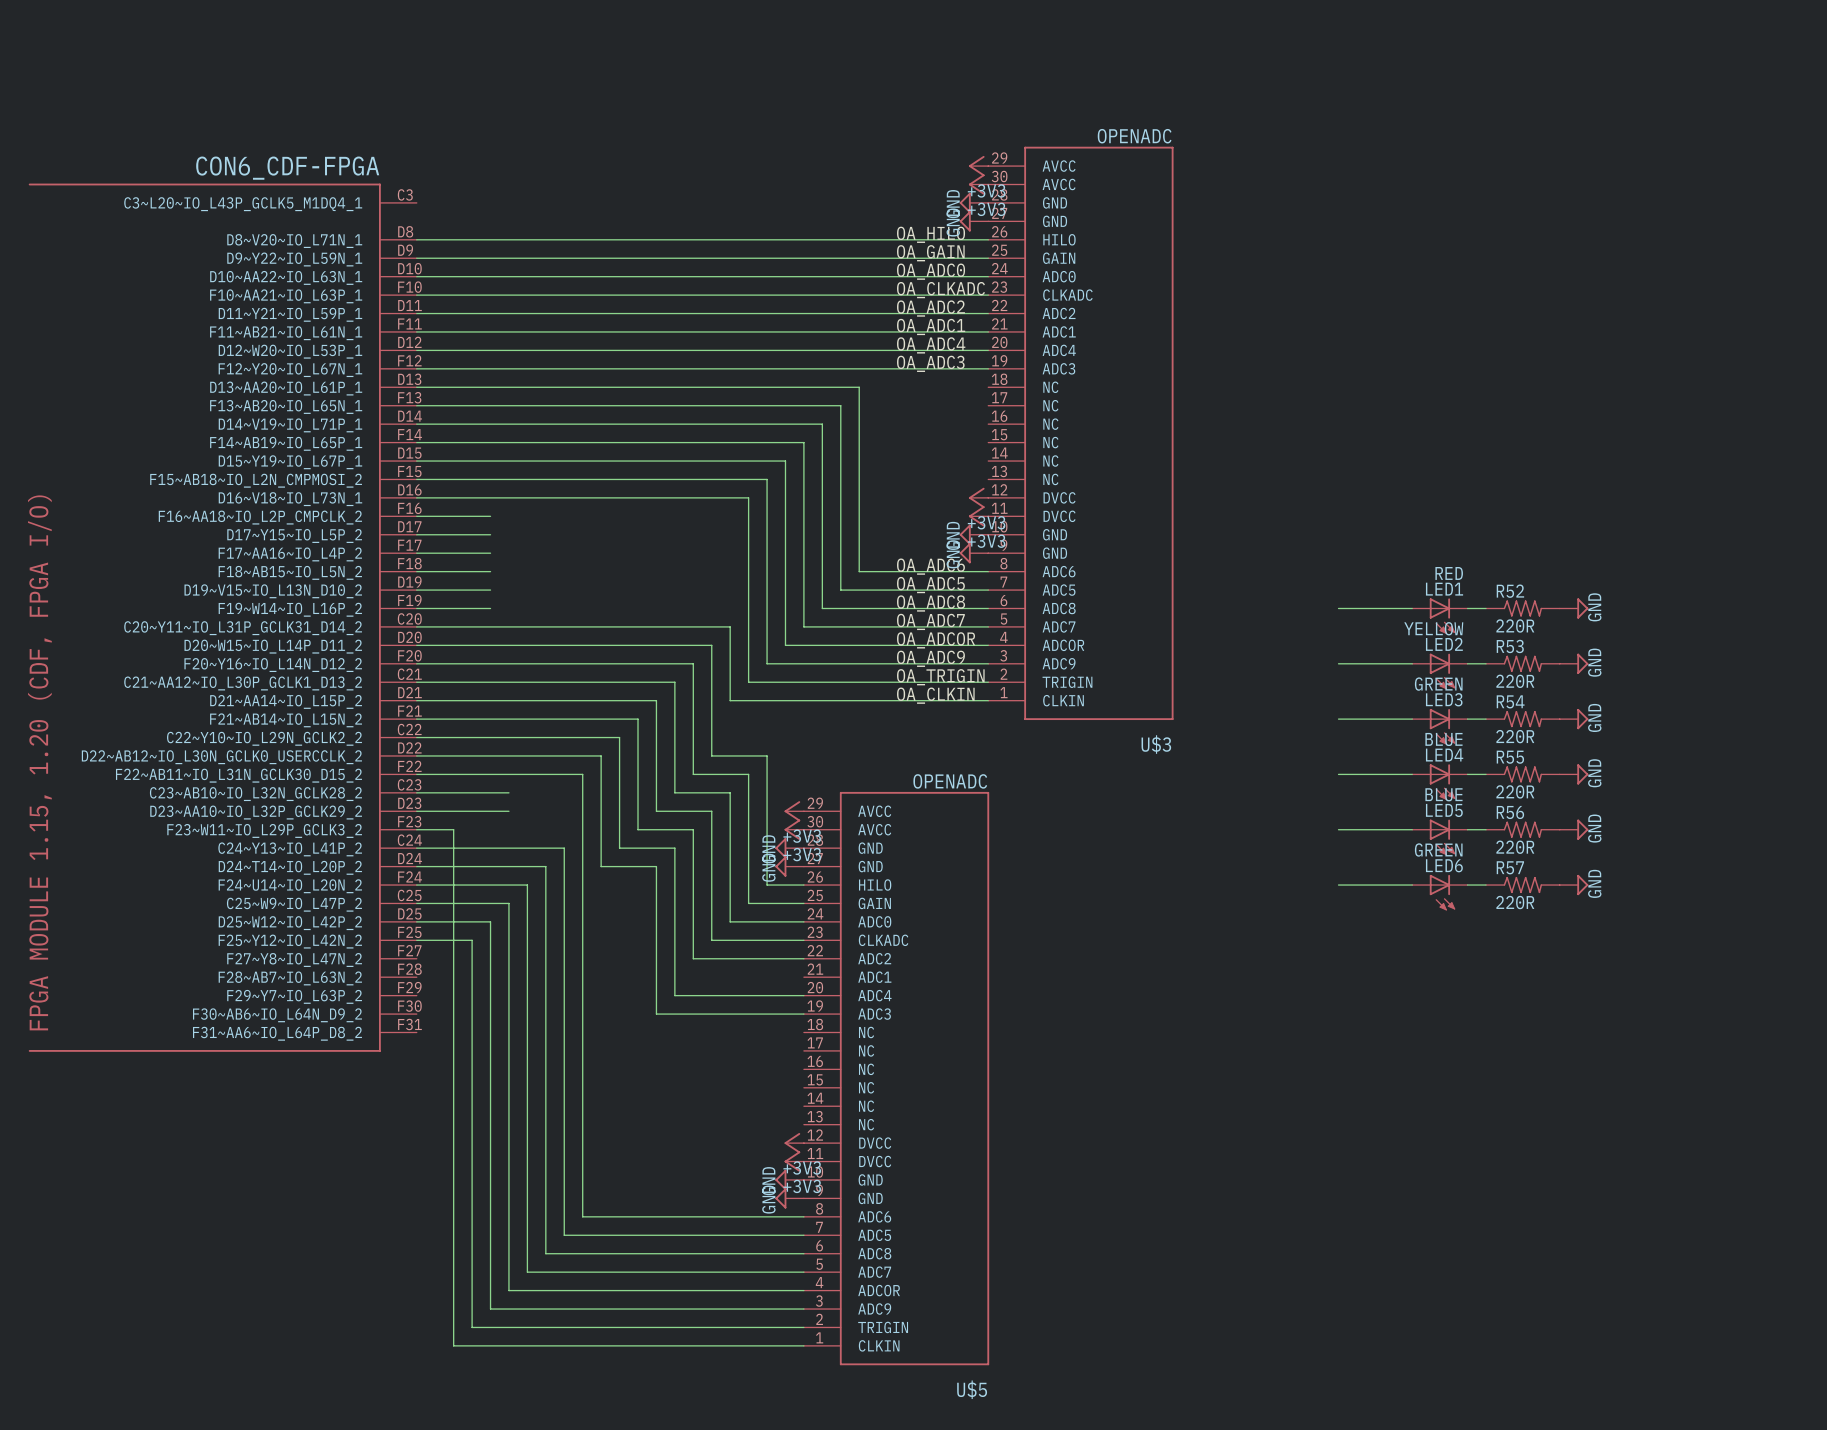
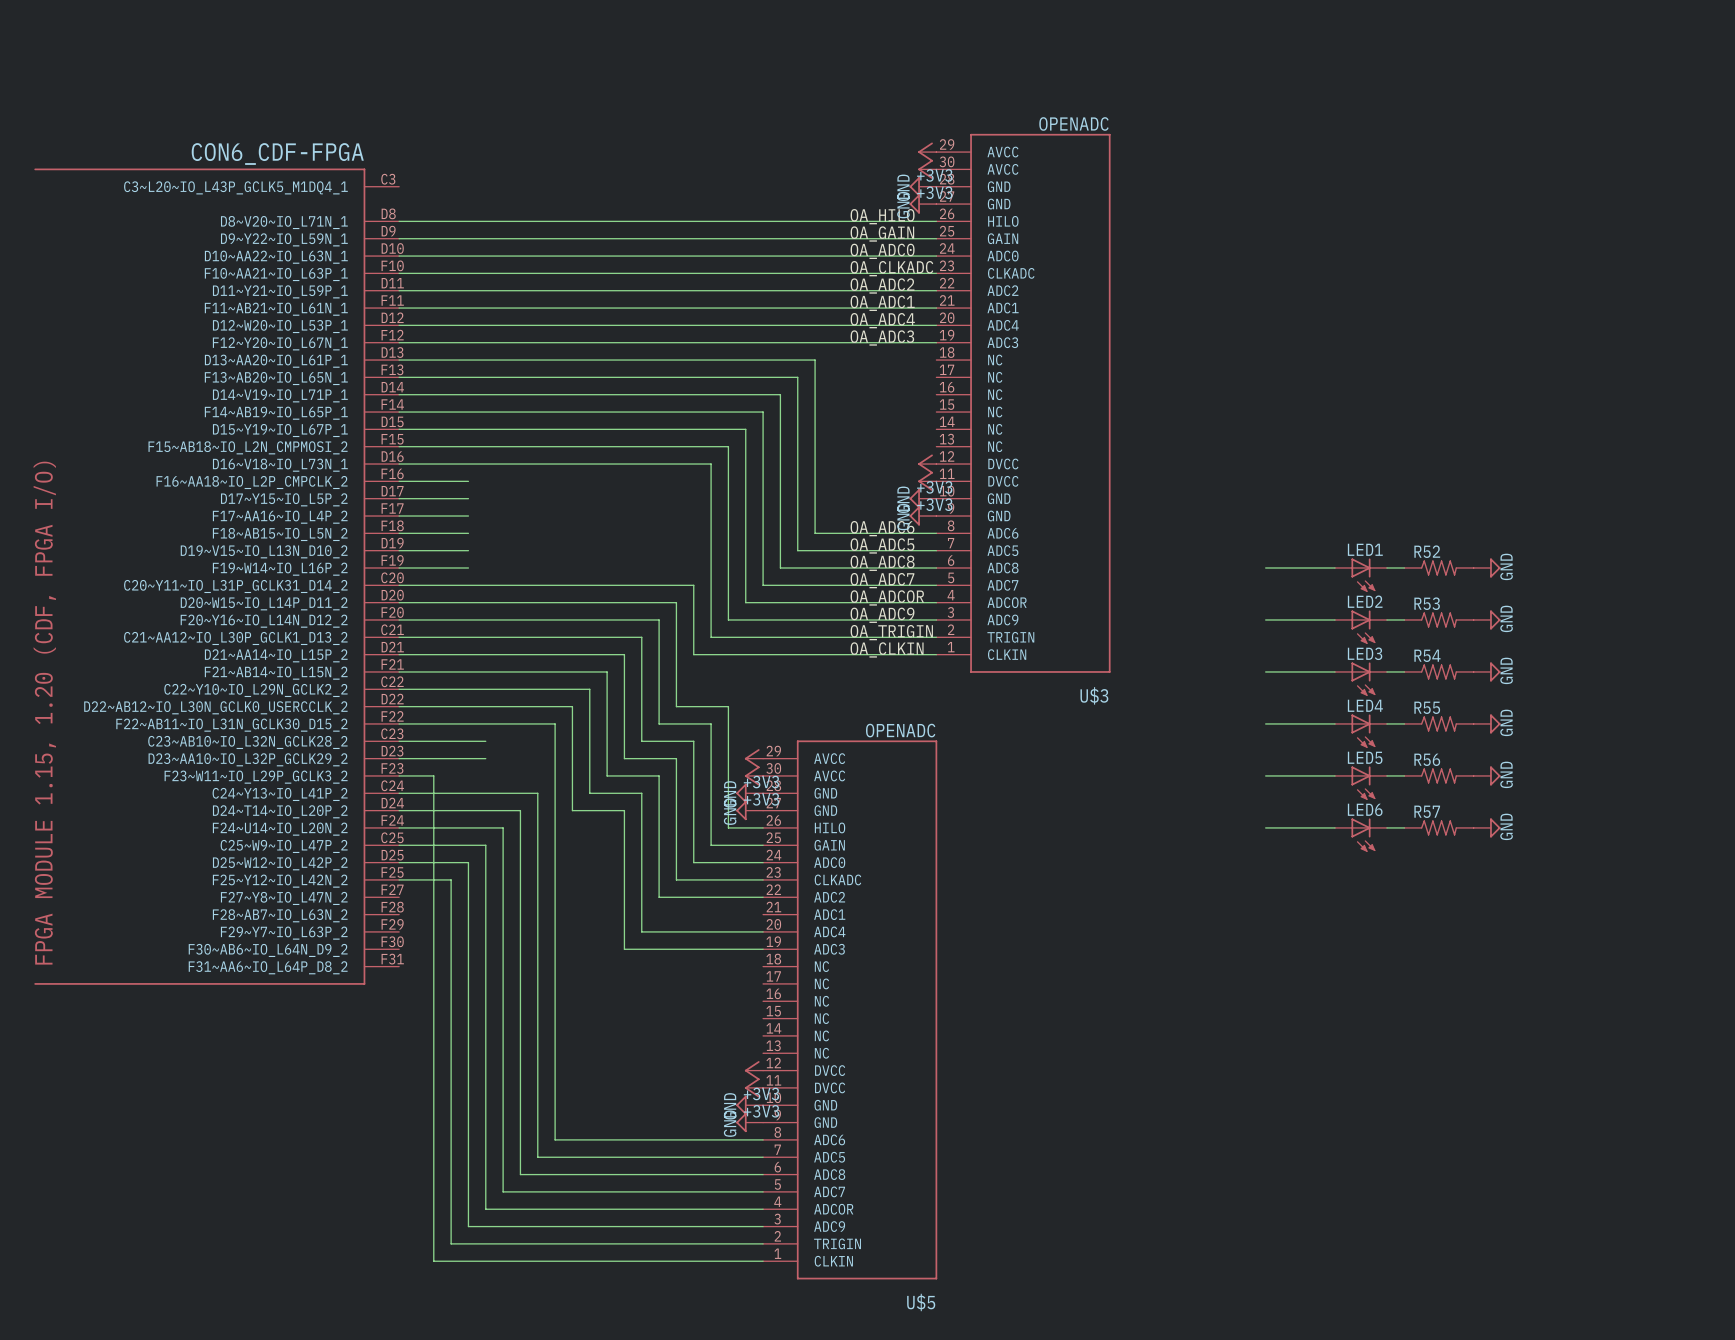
LED1 value: RED (1449, 573) -> none
R52 value: 220R (1515, 626) -> none
LED2 value: YELLOW (1433, 628) -> none
R53 value: 220R (1515, 681) -> none
LED3 value: GREEN (1438, 684) -> none
R54 value: 220R (1515, 736) -> none
LED4 value: BLUE (1443, 739) -> none
R55 value: 220R (1515, 791) -> none
LED5 value: BLUE (1443, 794) -> none
R56 value: 220R (1515, 847) -> none
LED6 value: GREEN (1438, 849) -> none
R57 value: 220R (1515, 902) -> none

